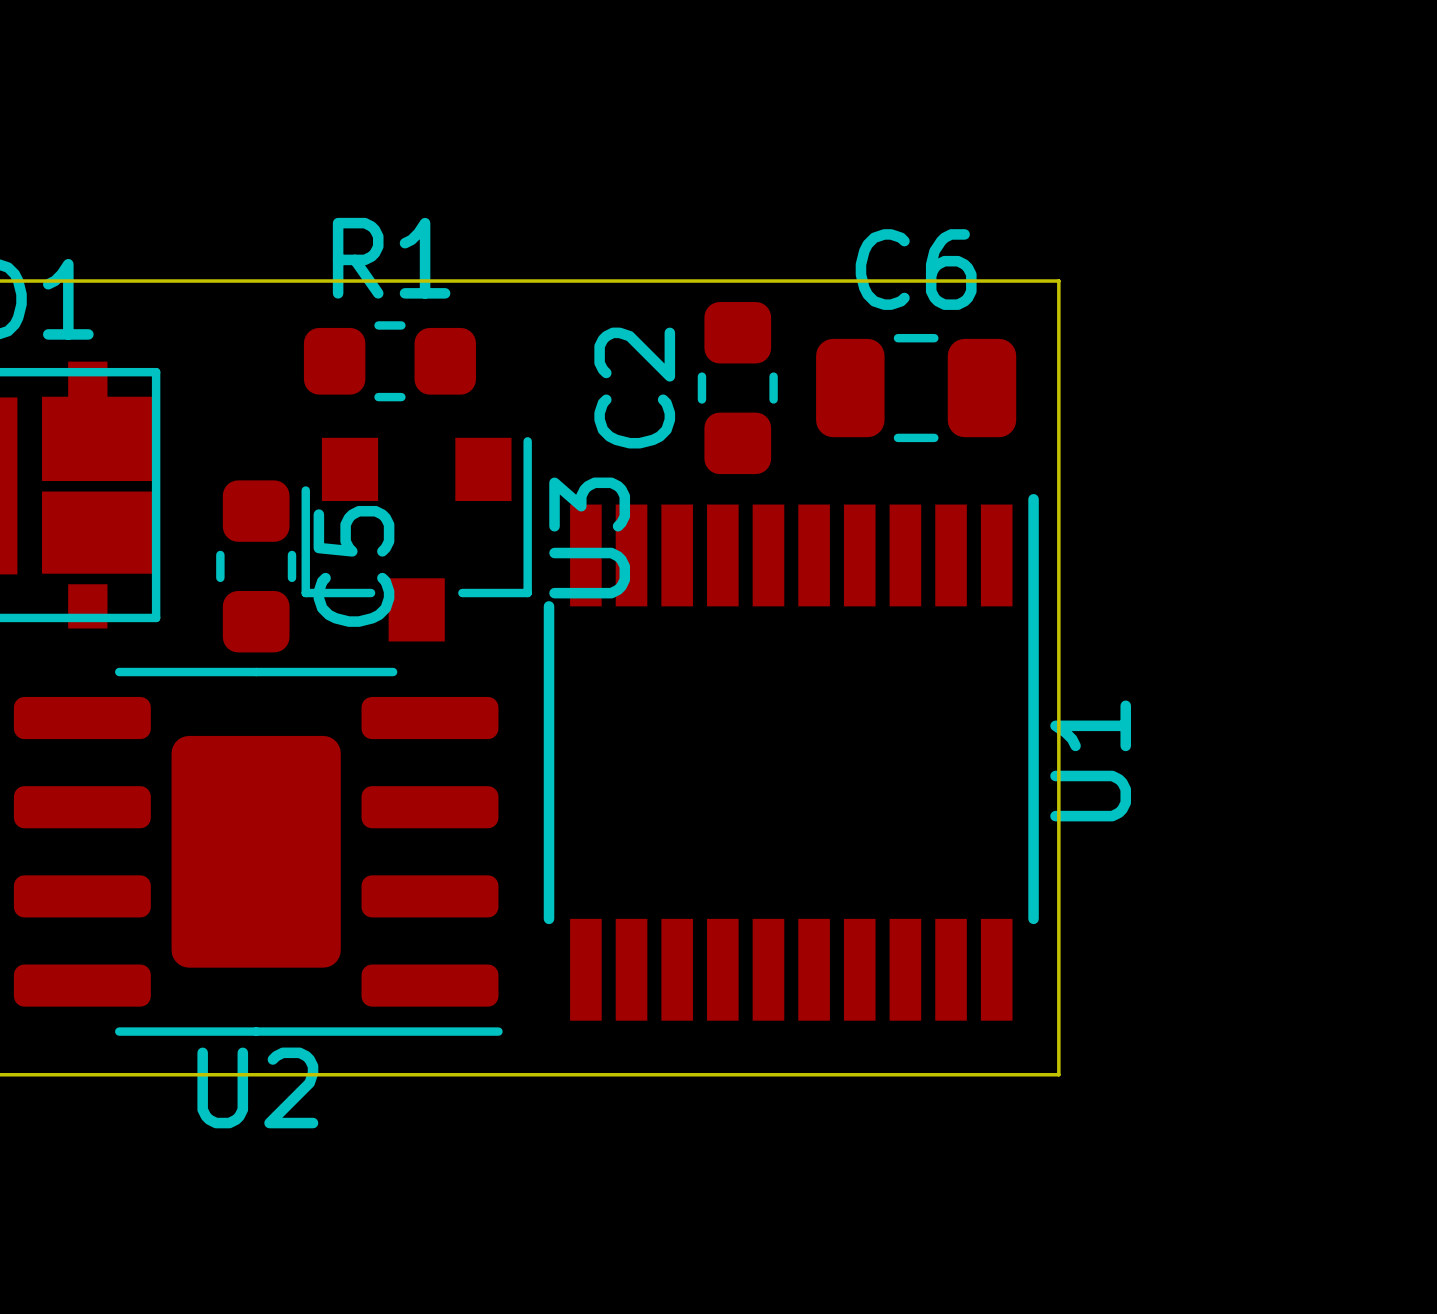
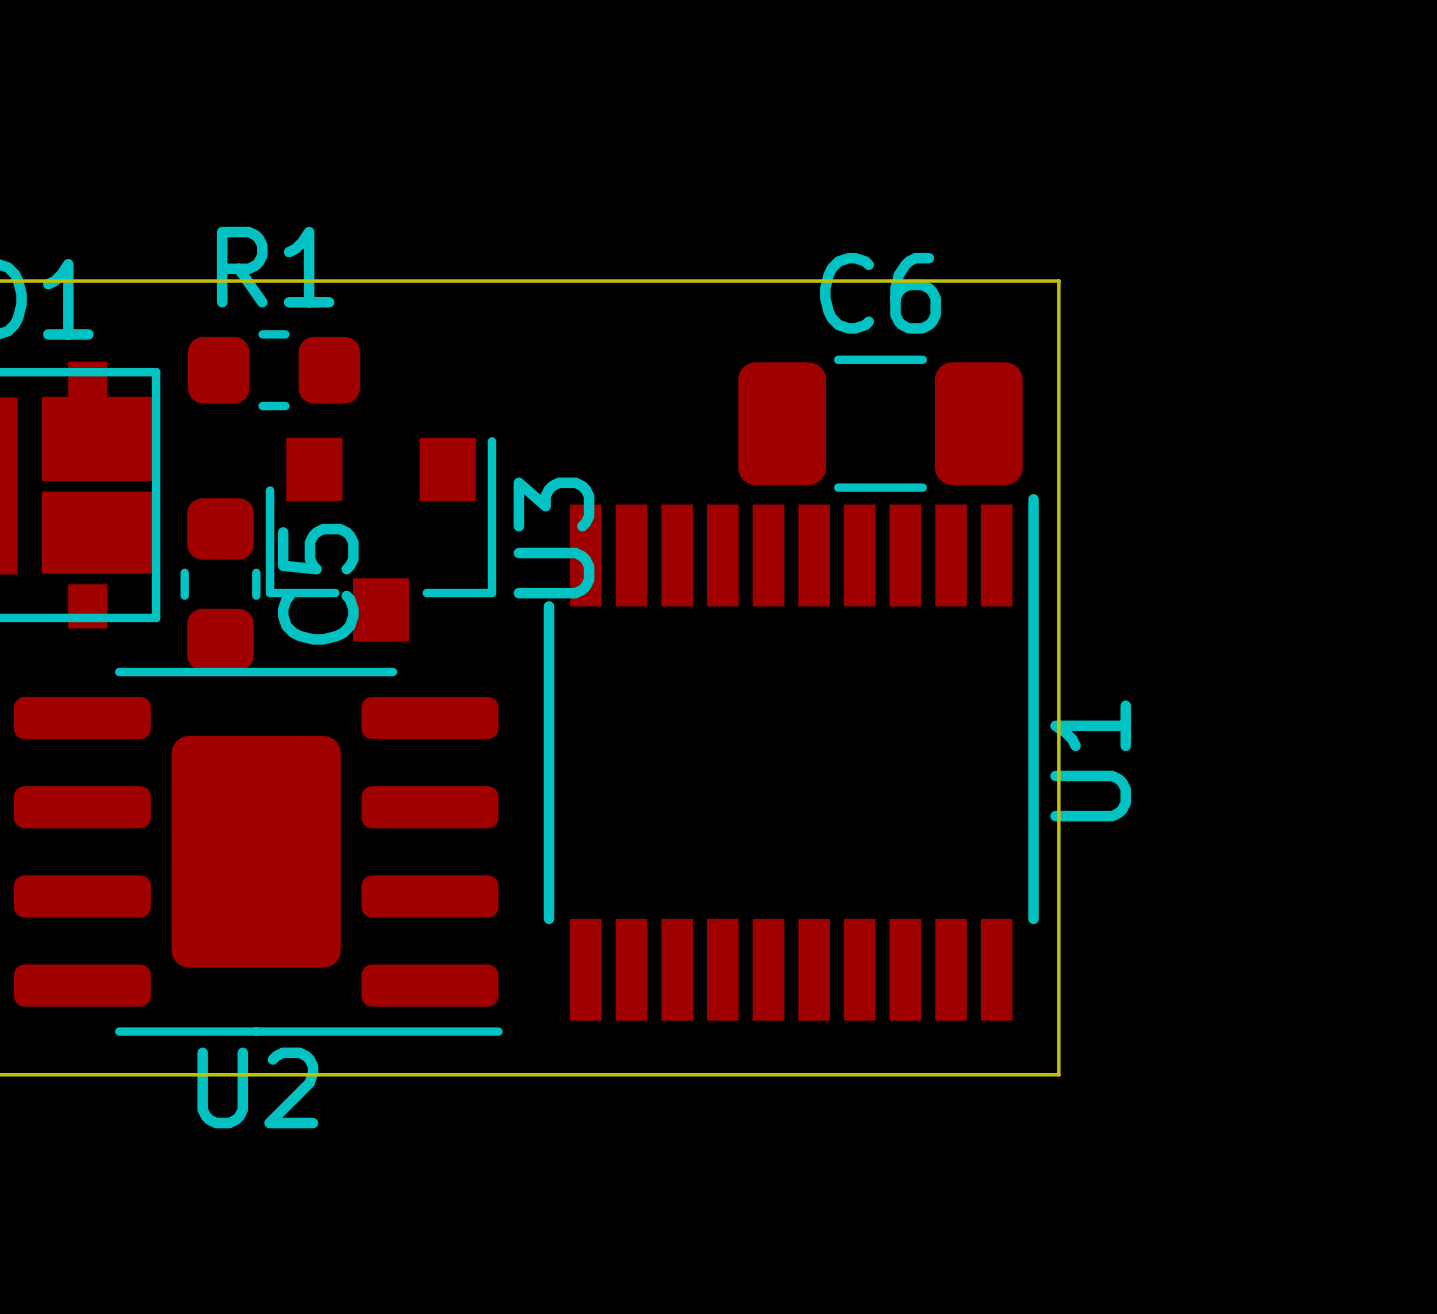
C6 footprint: [816, 333, 1017, 443] -> [738, 355, 1023, 492]
R1 position: (389, 361) -> (274, 370)
C2: (737, 388) -> none
U3 position: (416, 539) -> (381, 539)
C5 position: (256, 566) -> (220, 584)

